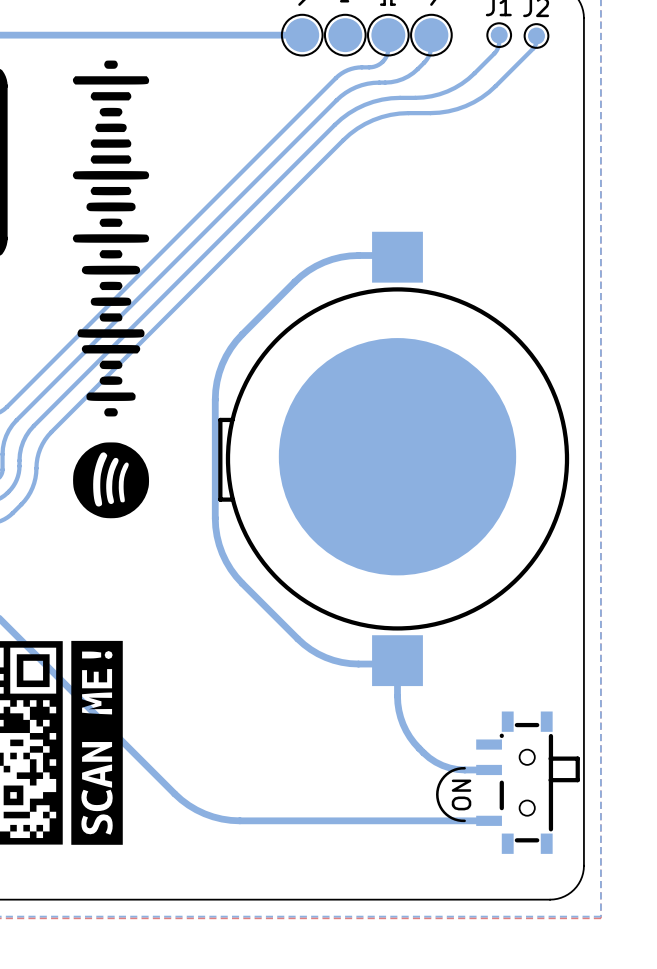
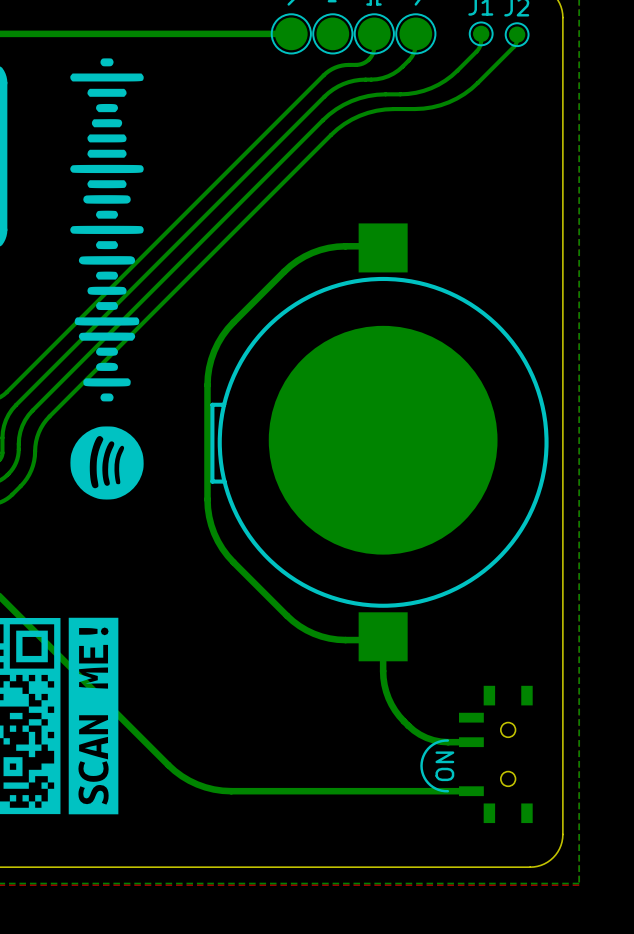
part footprint: [476, 711, 580, 854] -> [459, 685, 533, 824]

